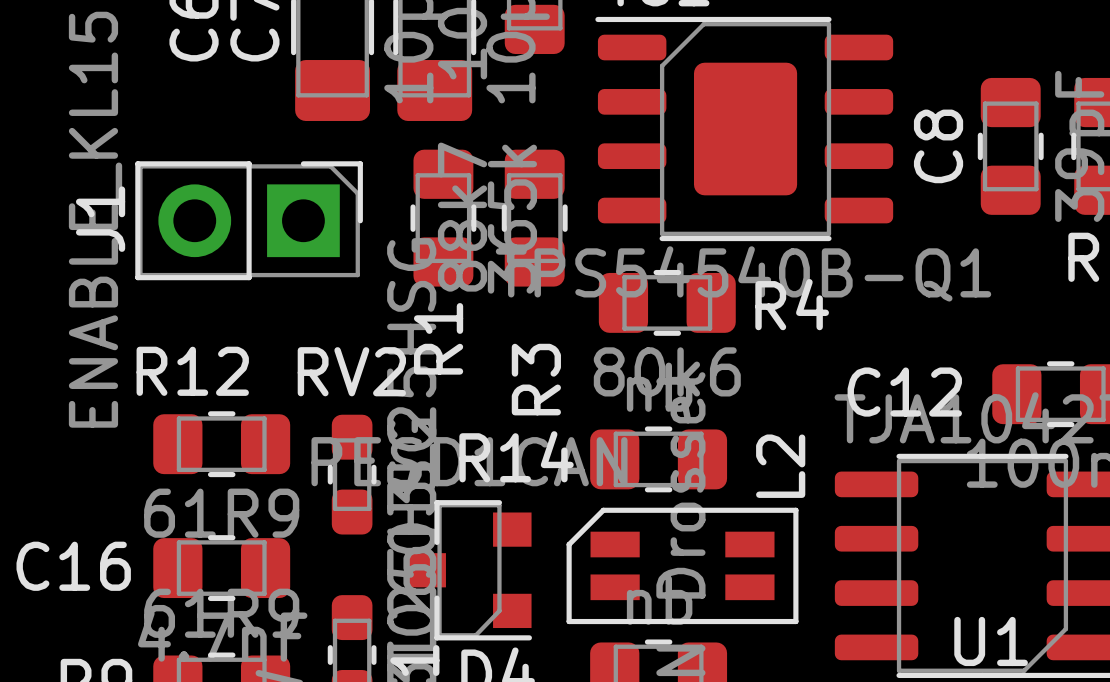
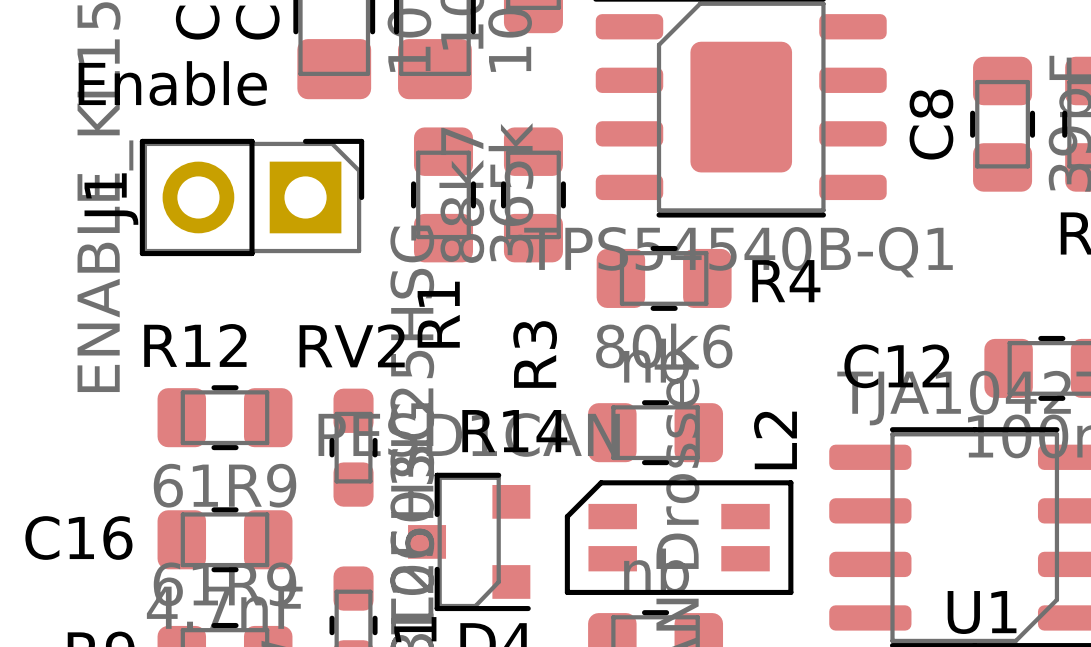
text: none -> Enable (172, 83)

